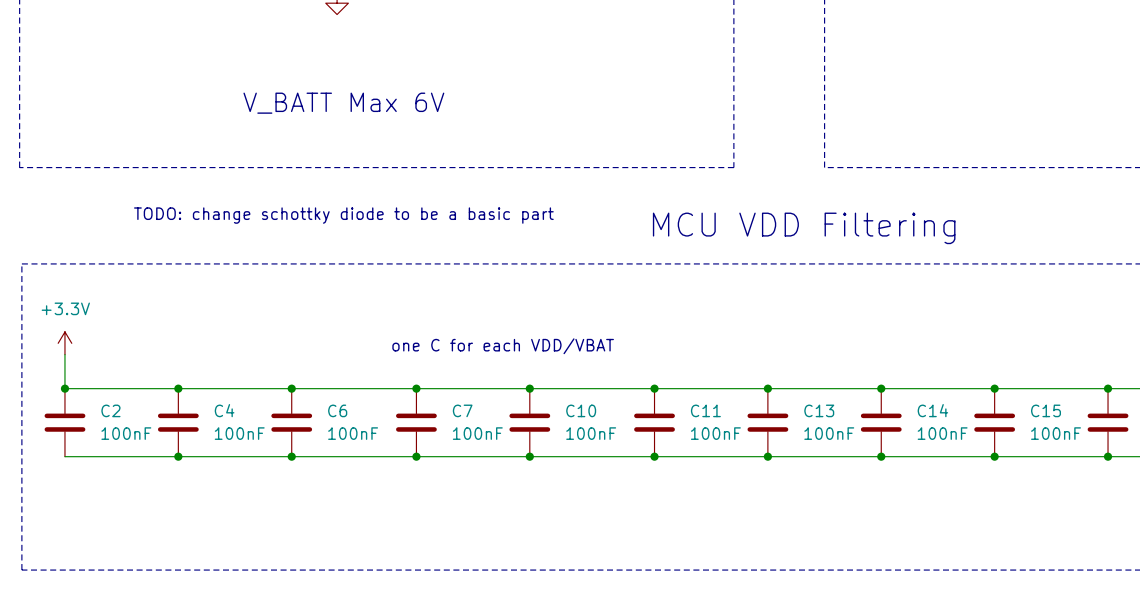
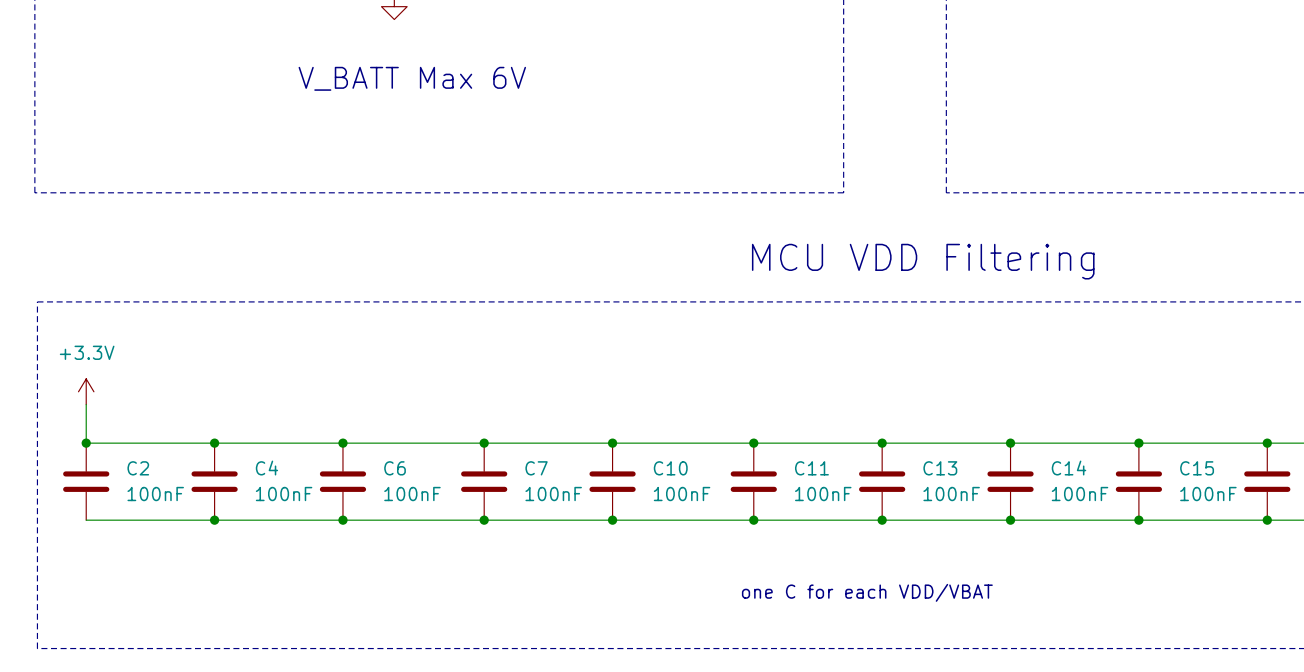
text position: V_BATT Max 6V (343, 103) -> V_BATT Max 6V (412, 78)
text: TODO: change schottky diode to be a basic part (343, 215) -> none
text: one C for each VDD/VBAT (503, 346) -> none
text: none -> one C for each VDD/VBAT (867, 592)

